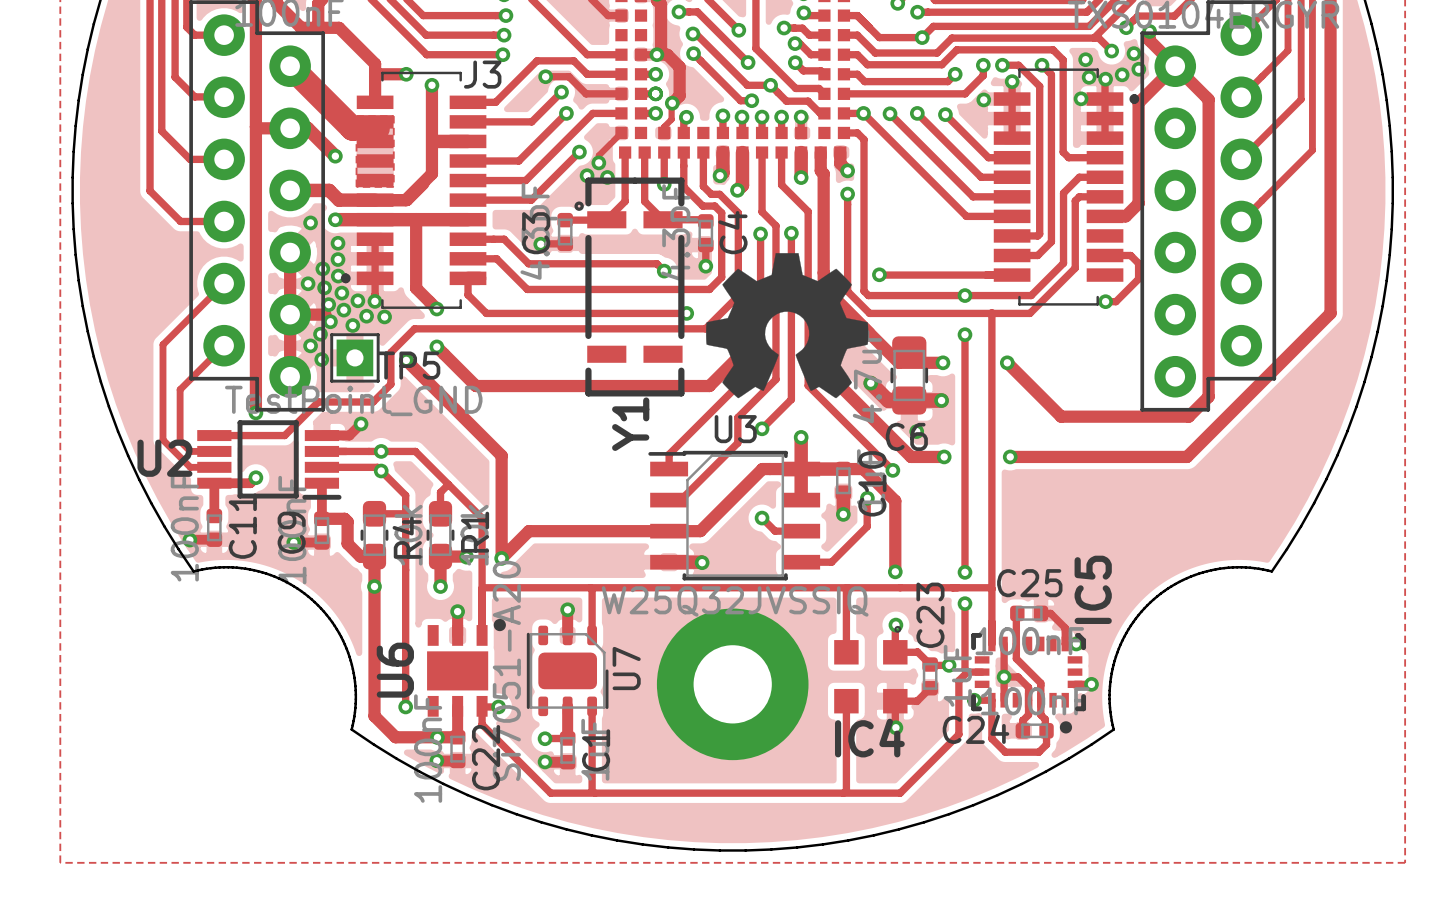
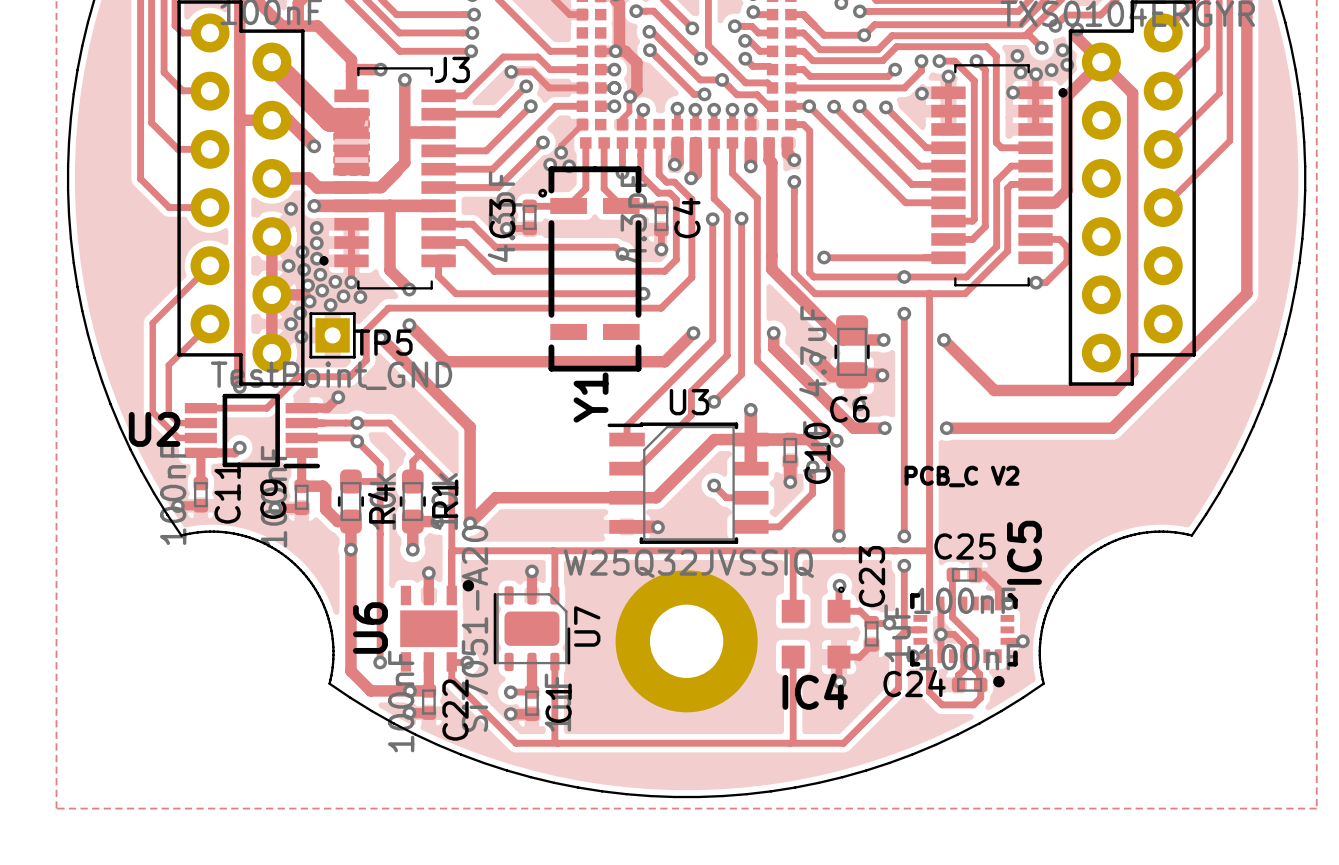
drawing: [706, 253, 869, 399] -> none
text: none -> PCB_C V2 (961, 476)

